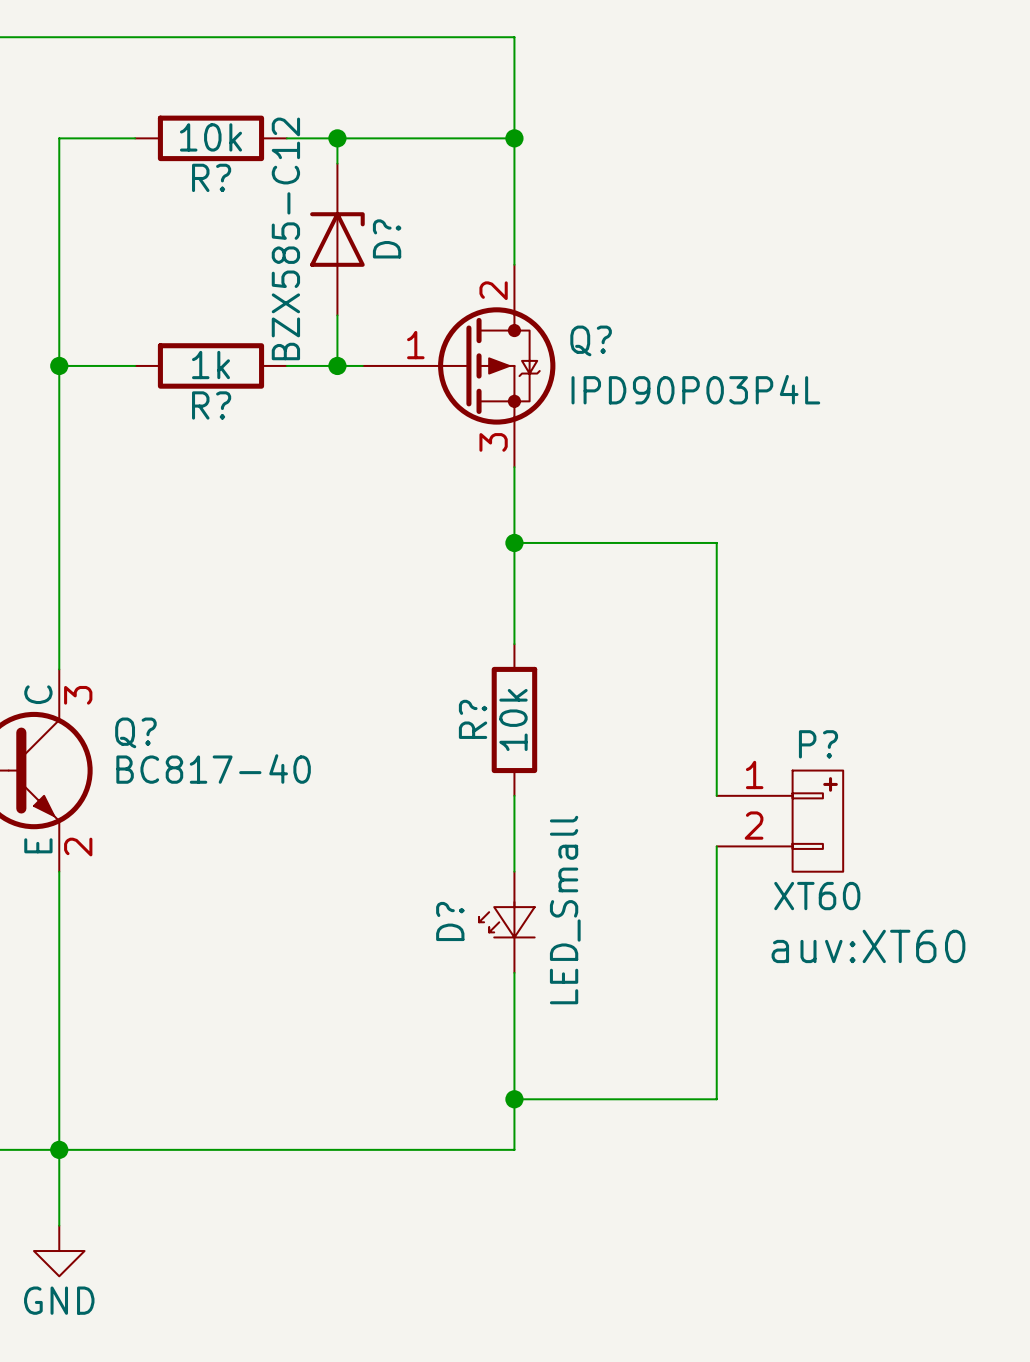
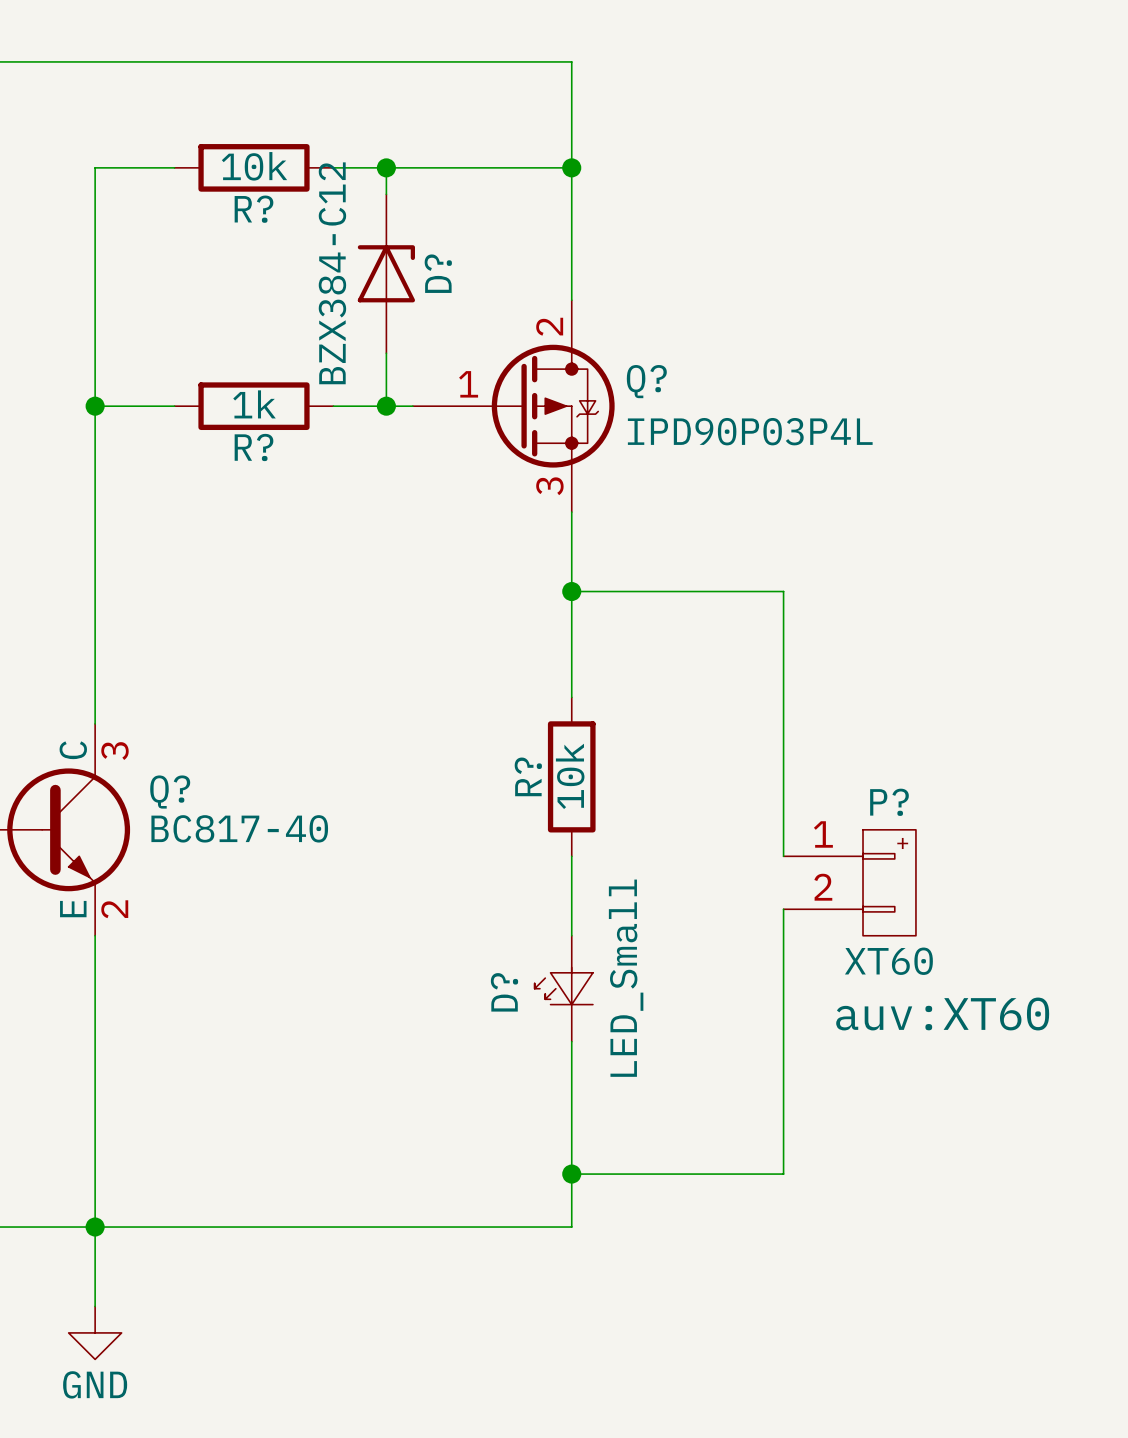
D? value: BZX585-C12 (285, 238) -> BZX384-C12 (332, 273)

